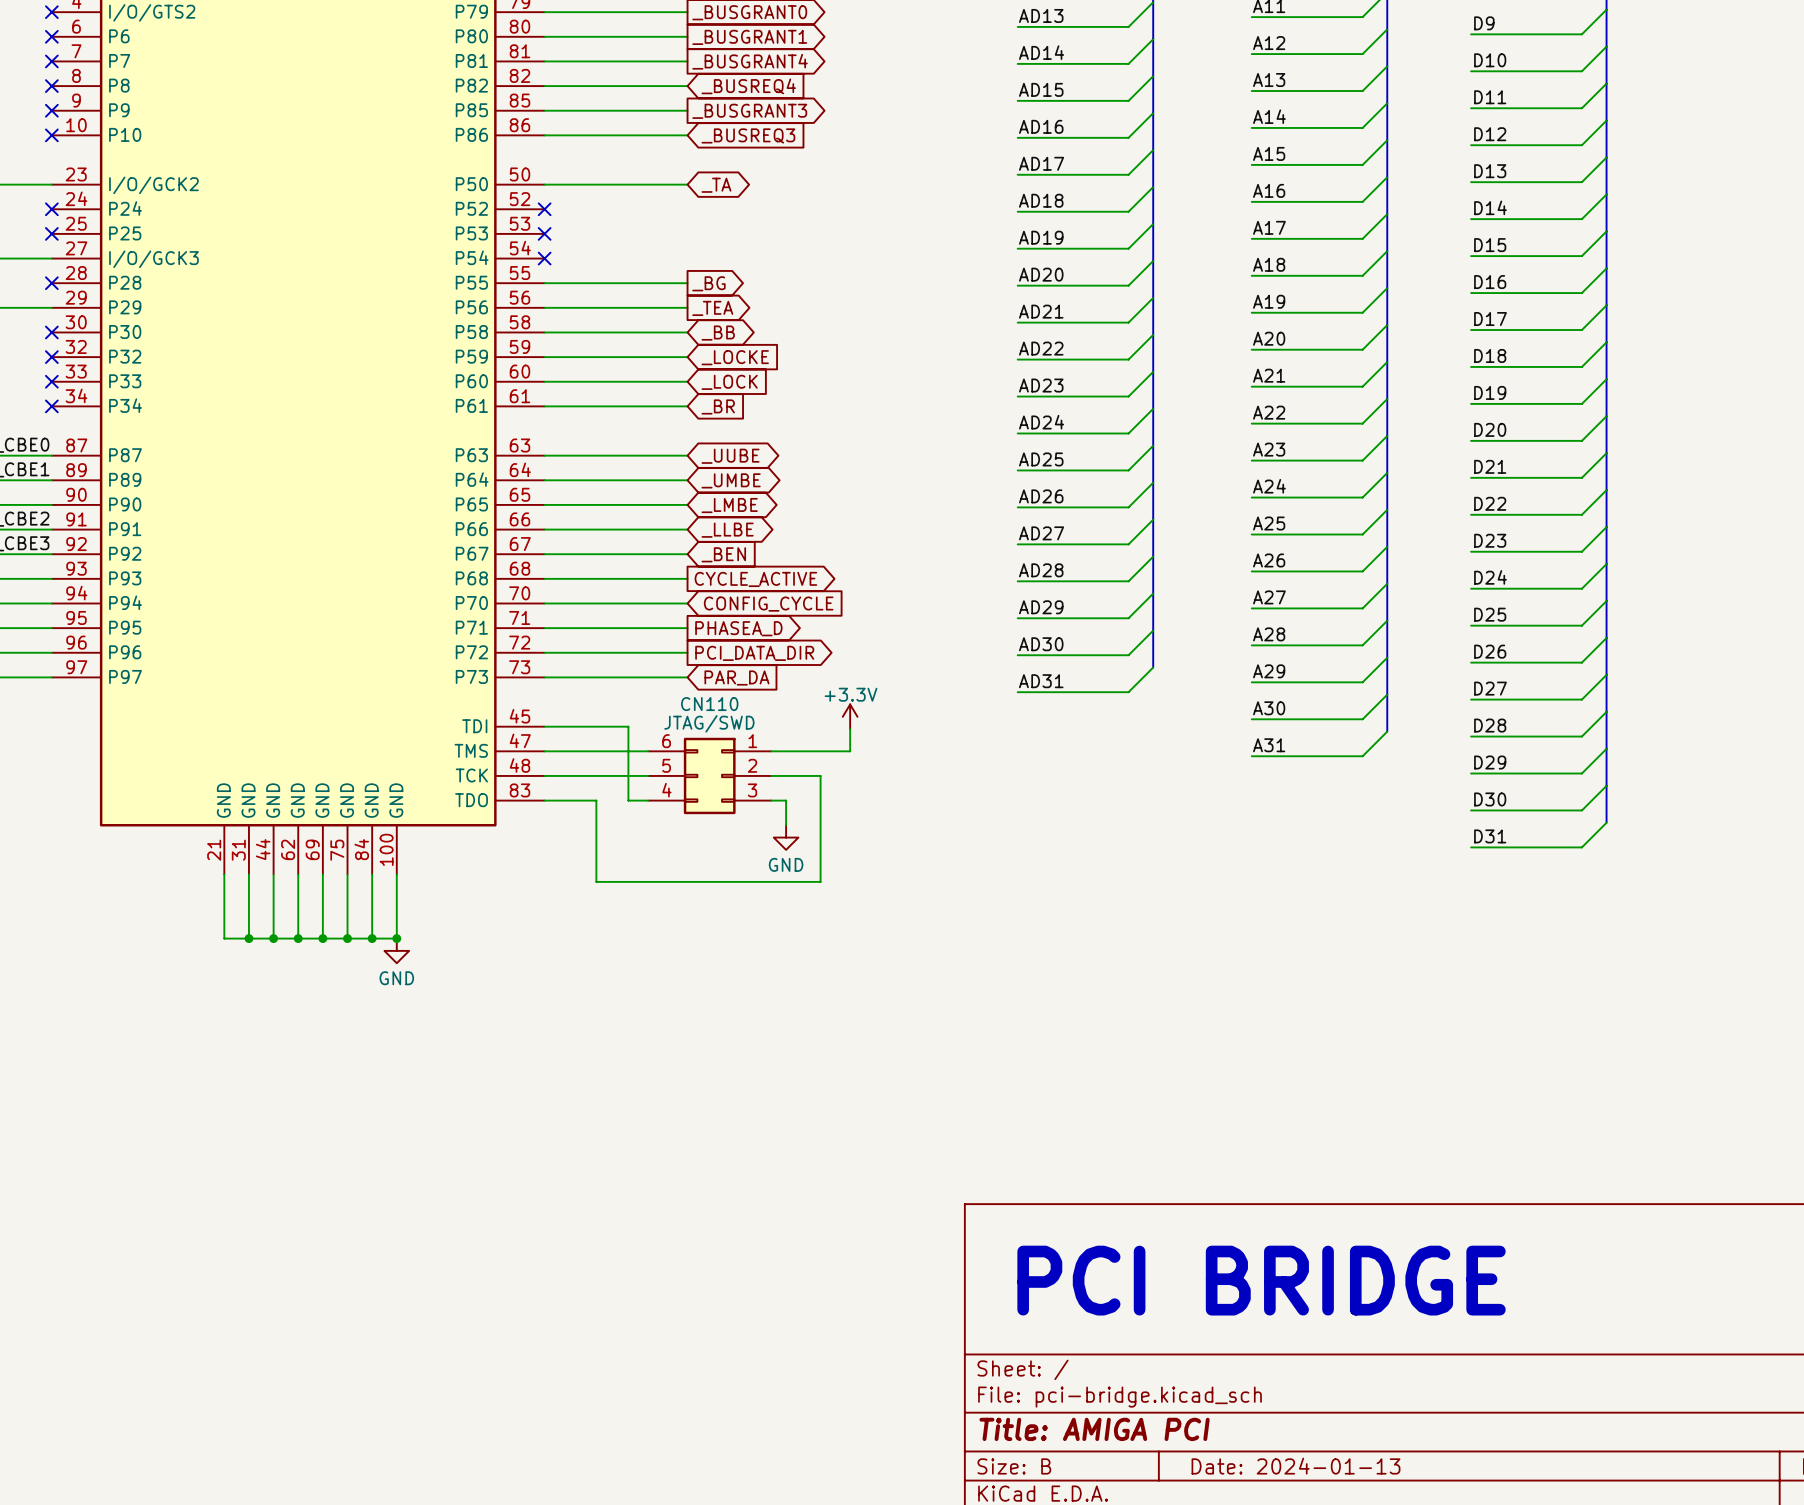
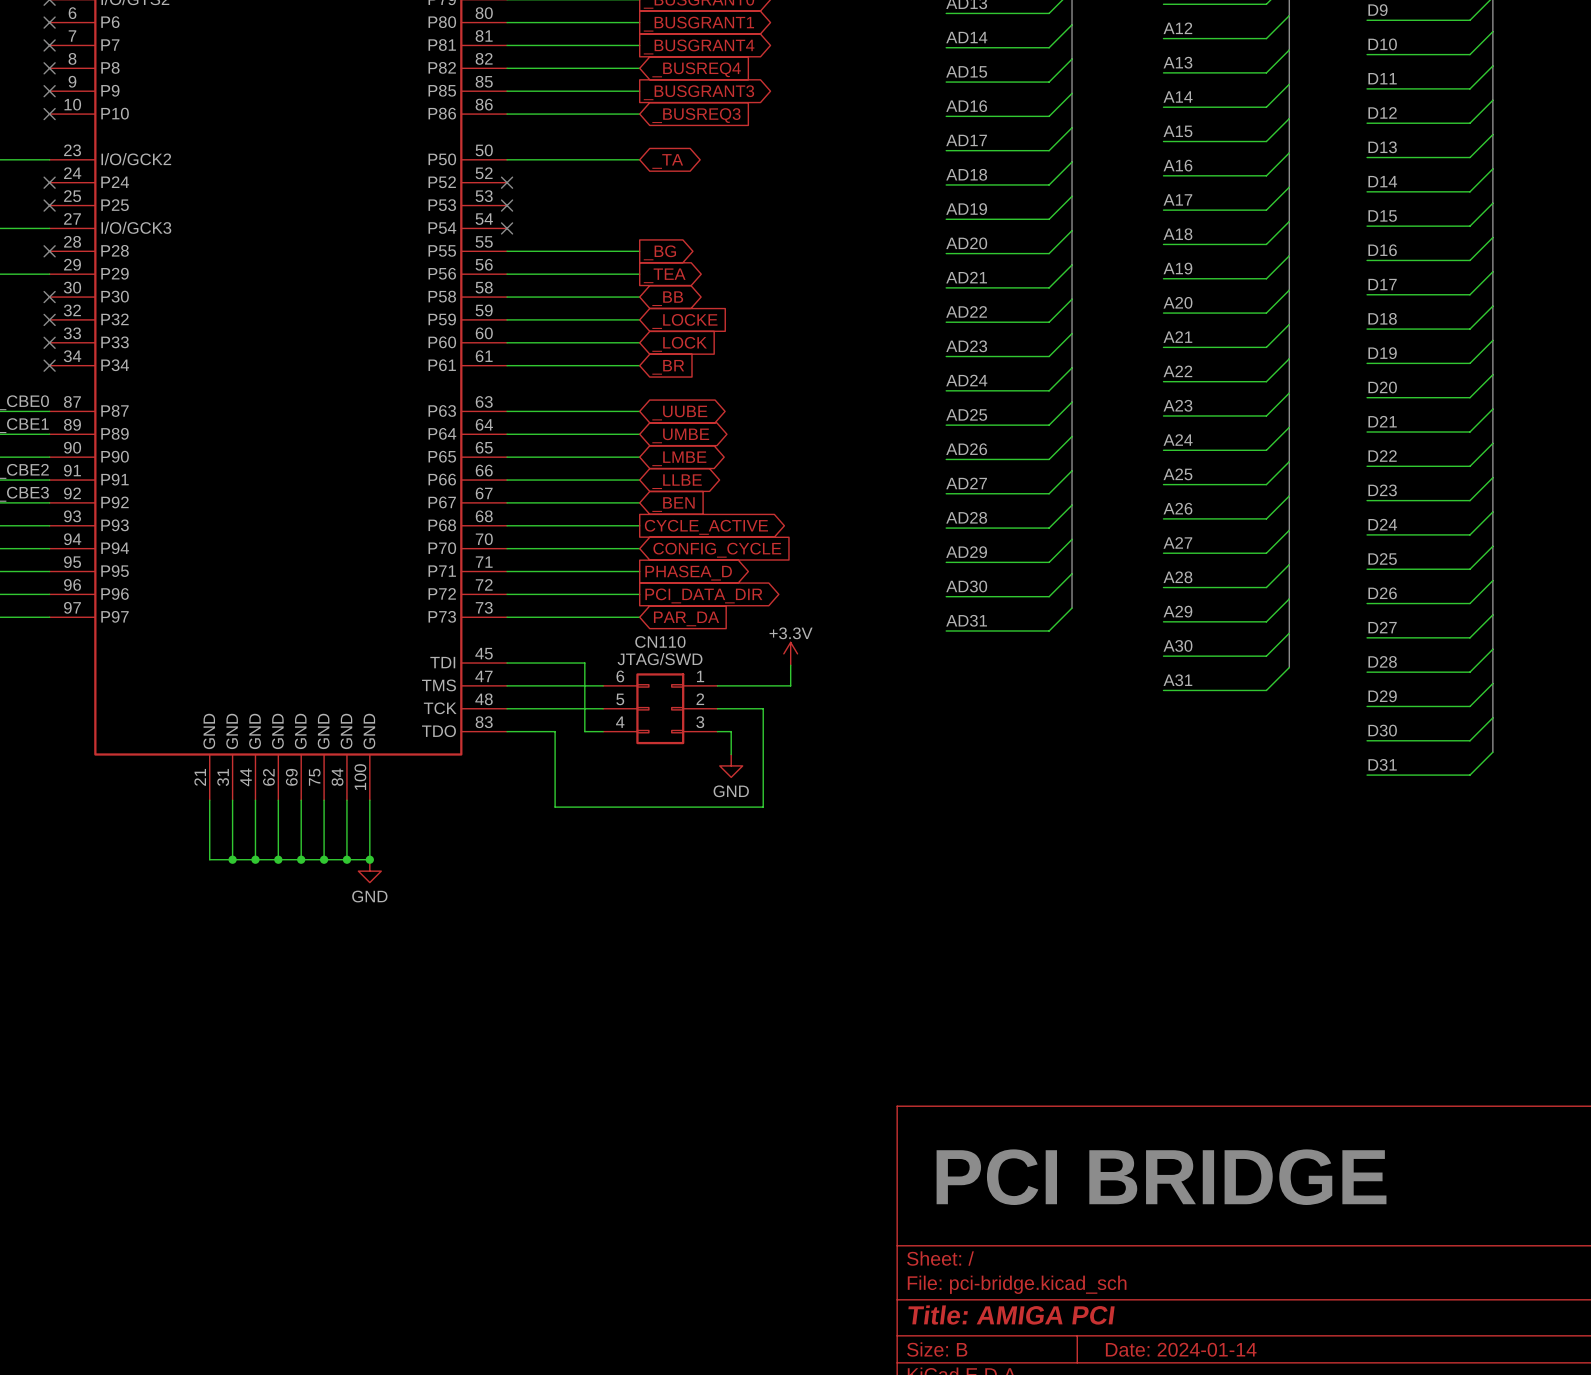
title block: Date: 2024-01-13 (1295, 1466) -> Date: 2024-01-14 (1181, 1349)

